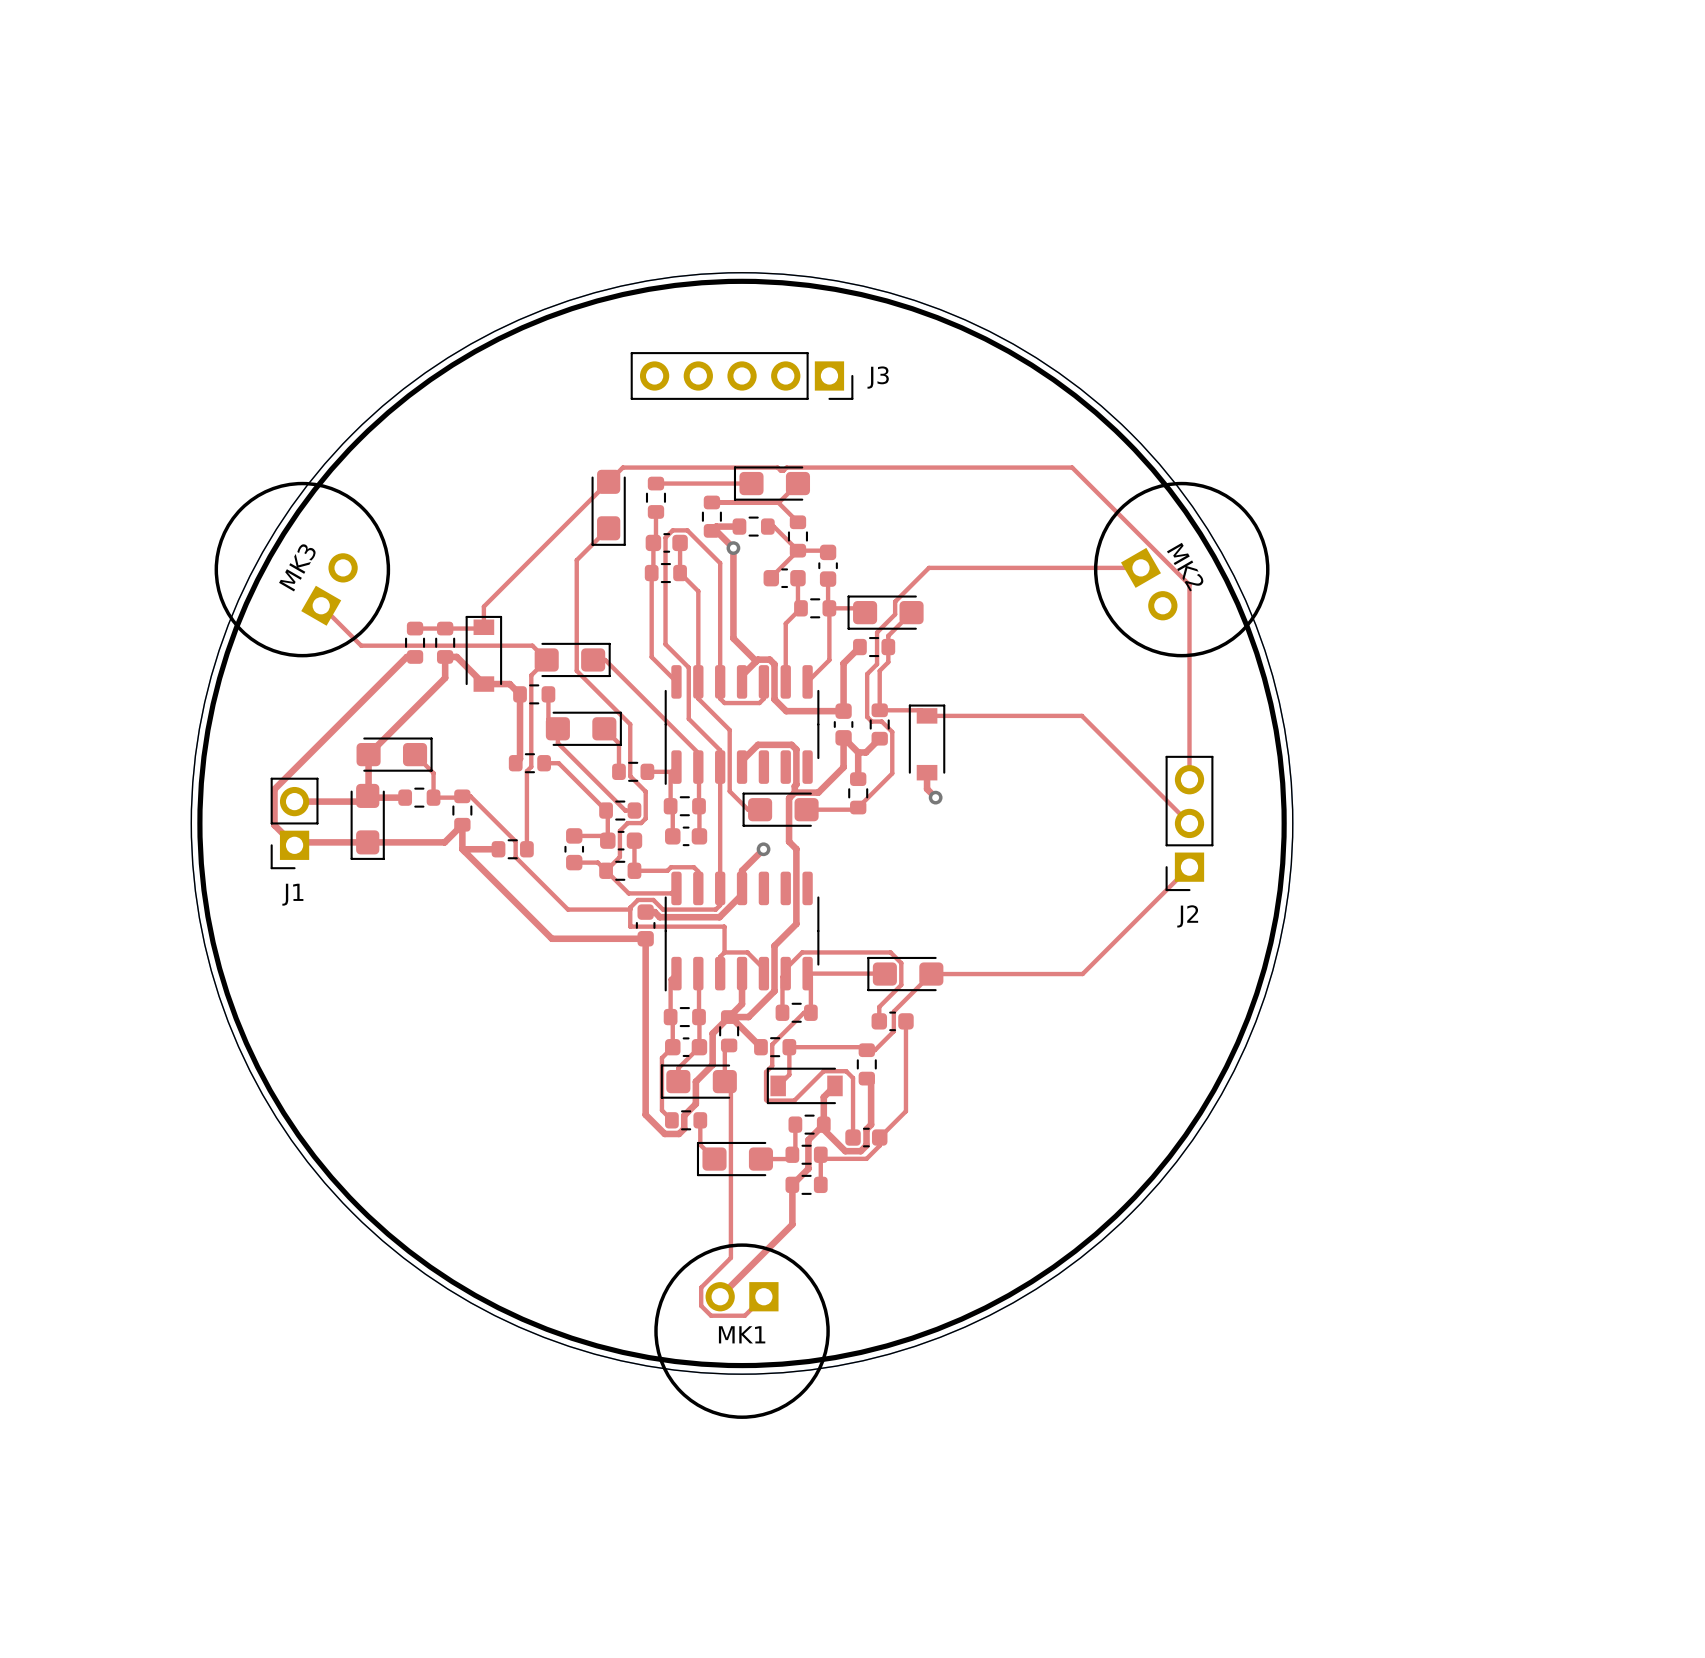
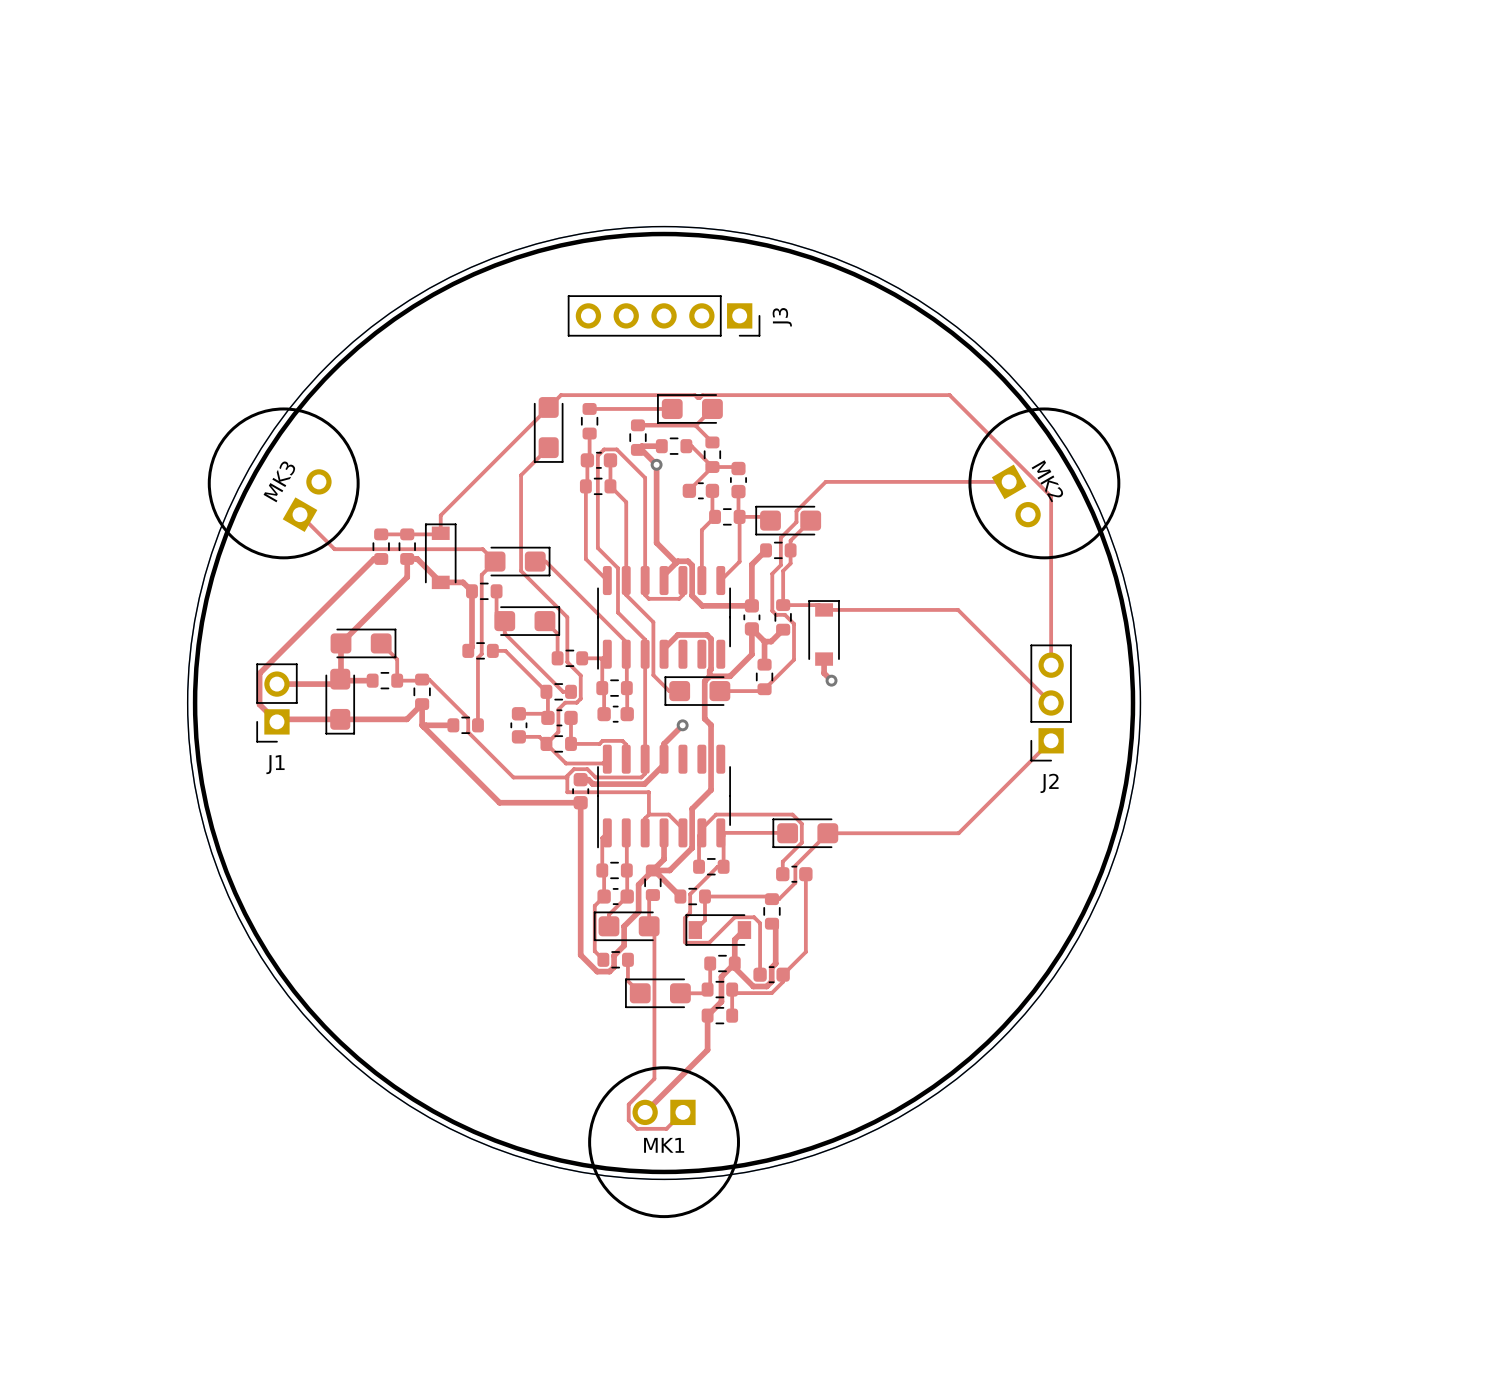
J3 name rotation: 0° (878, 377) -> 90° counterclockwise (782, 317)

